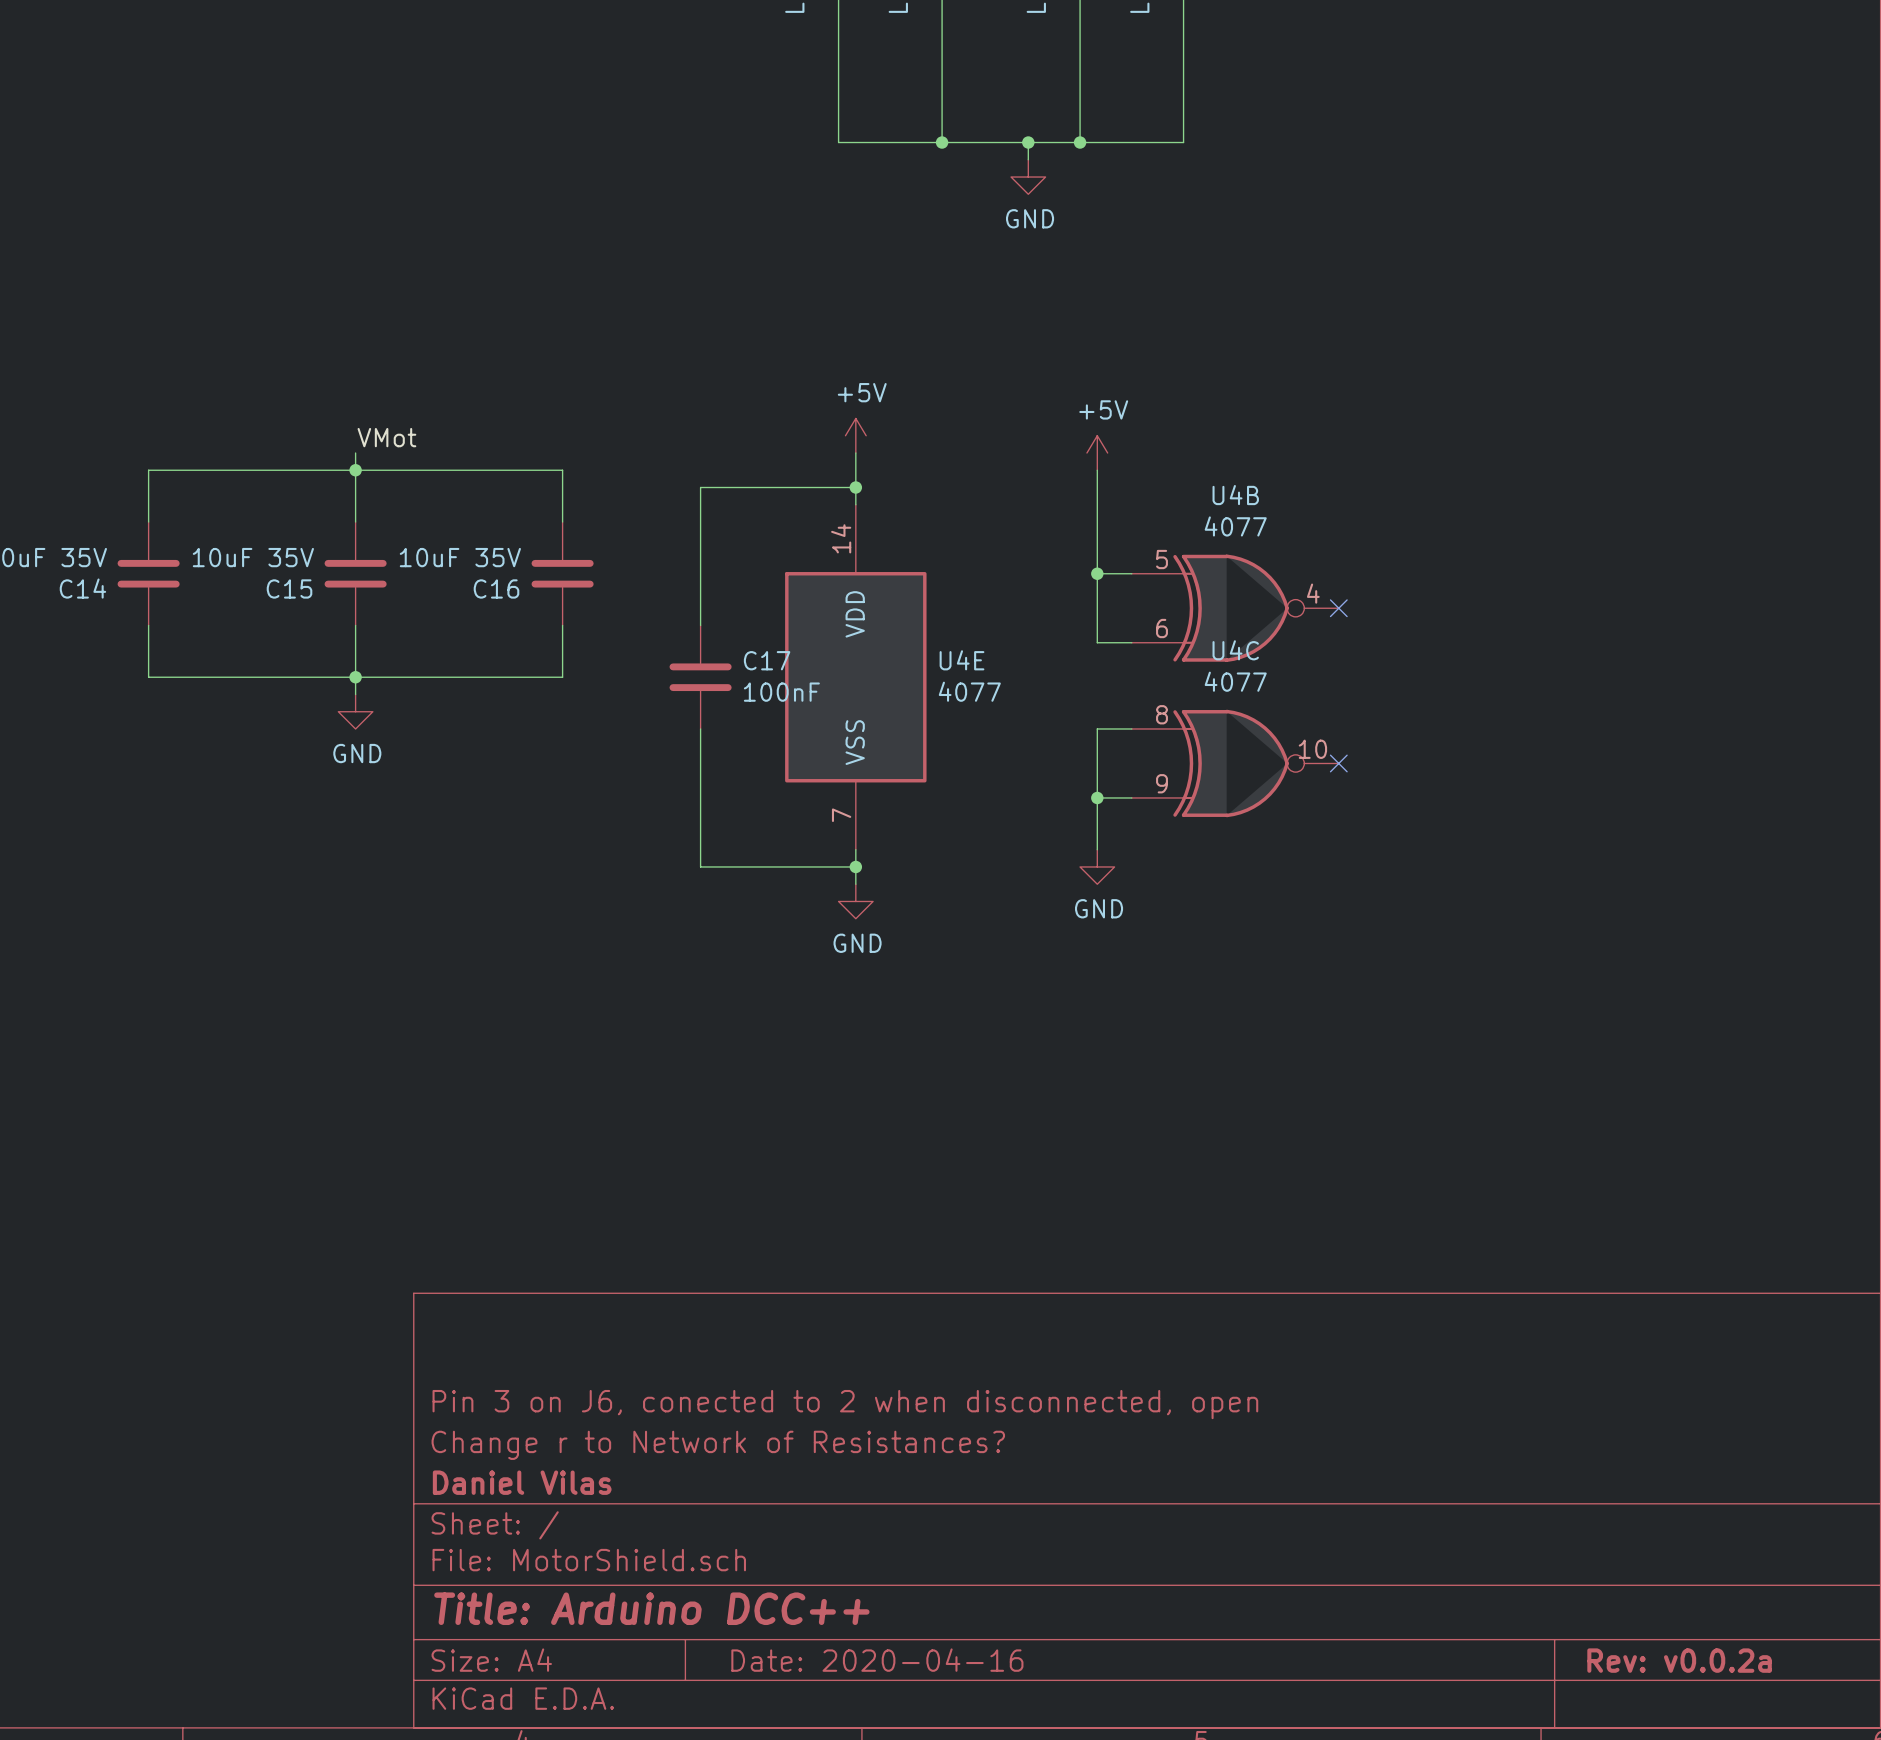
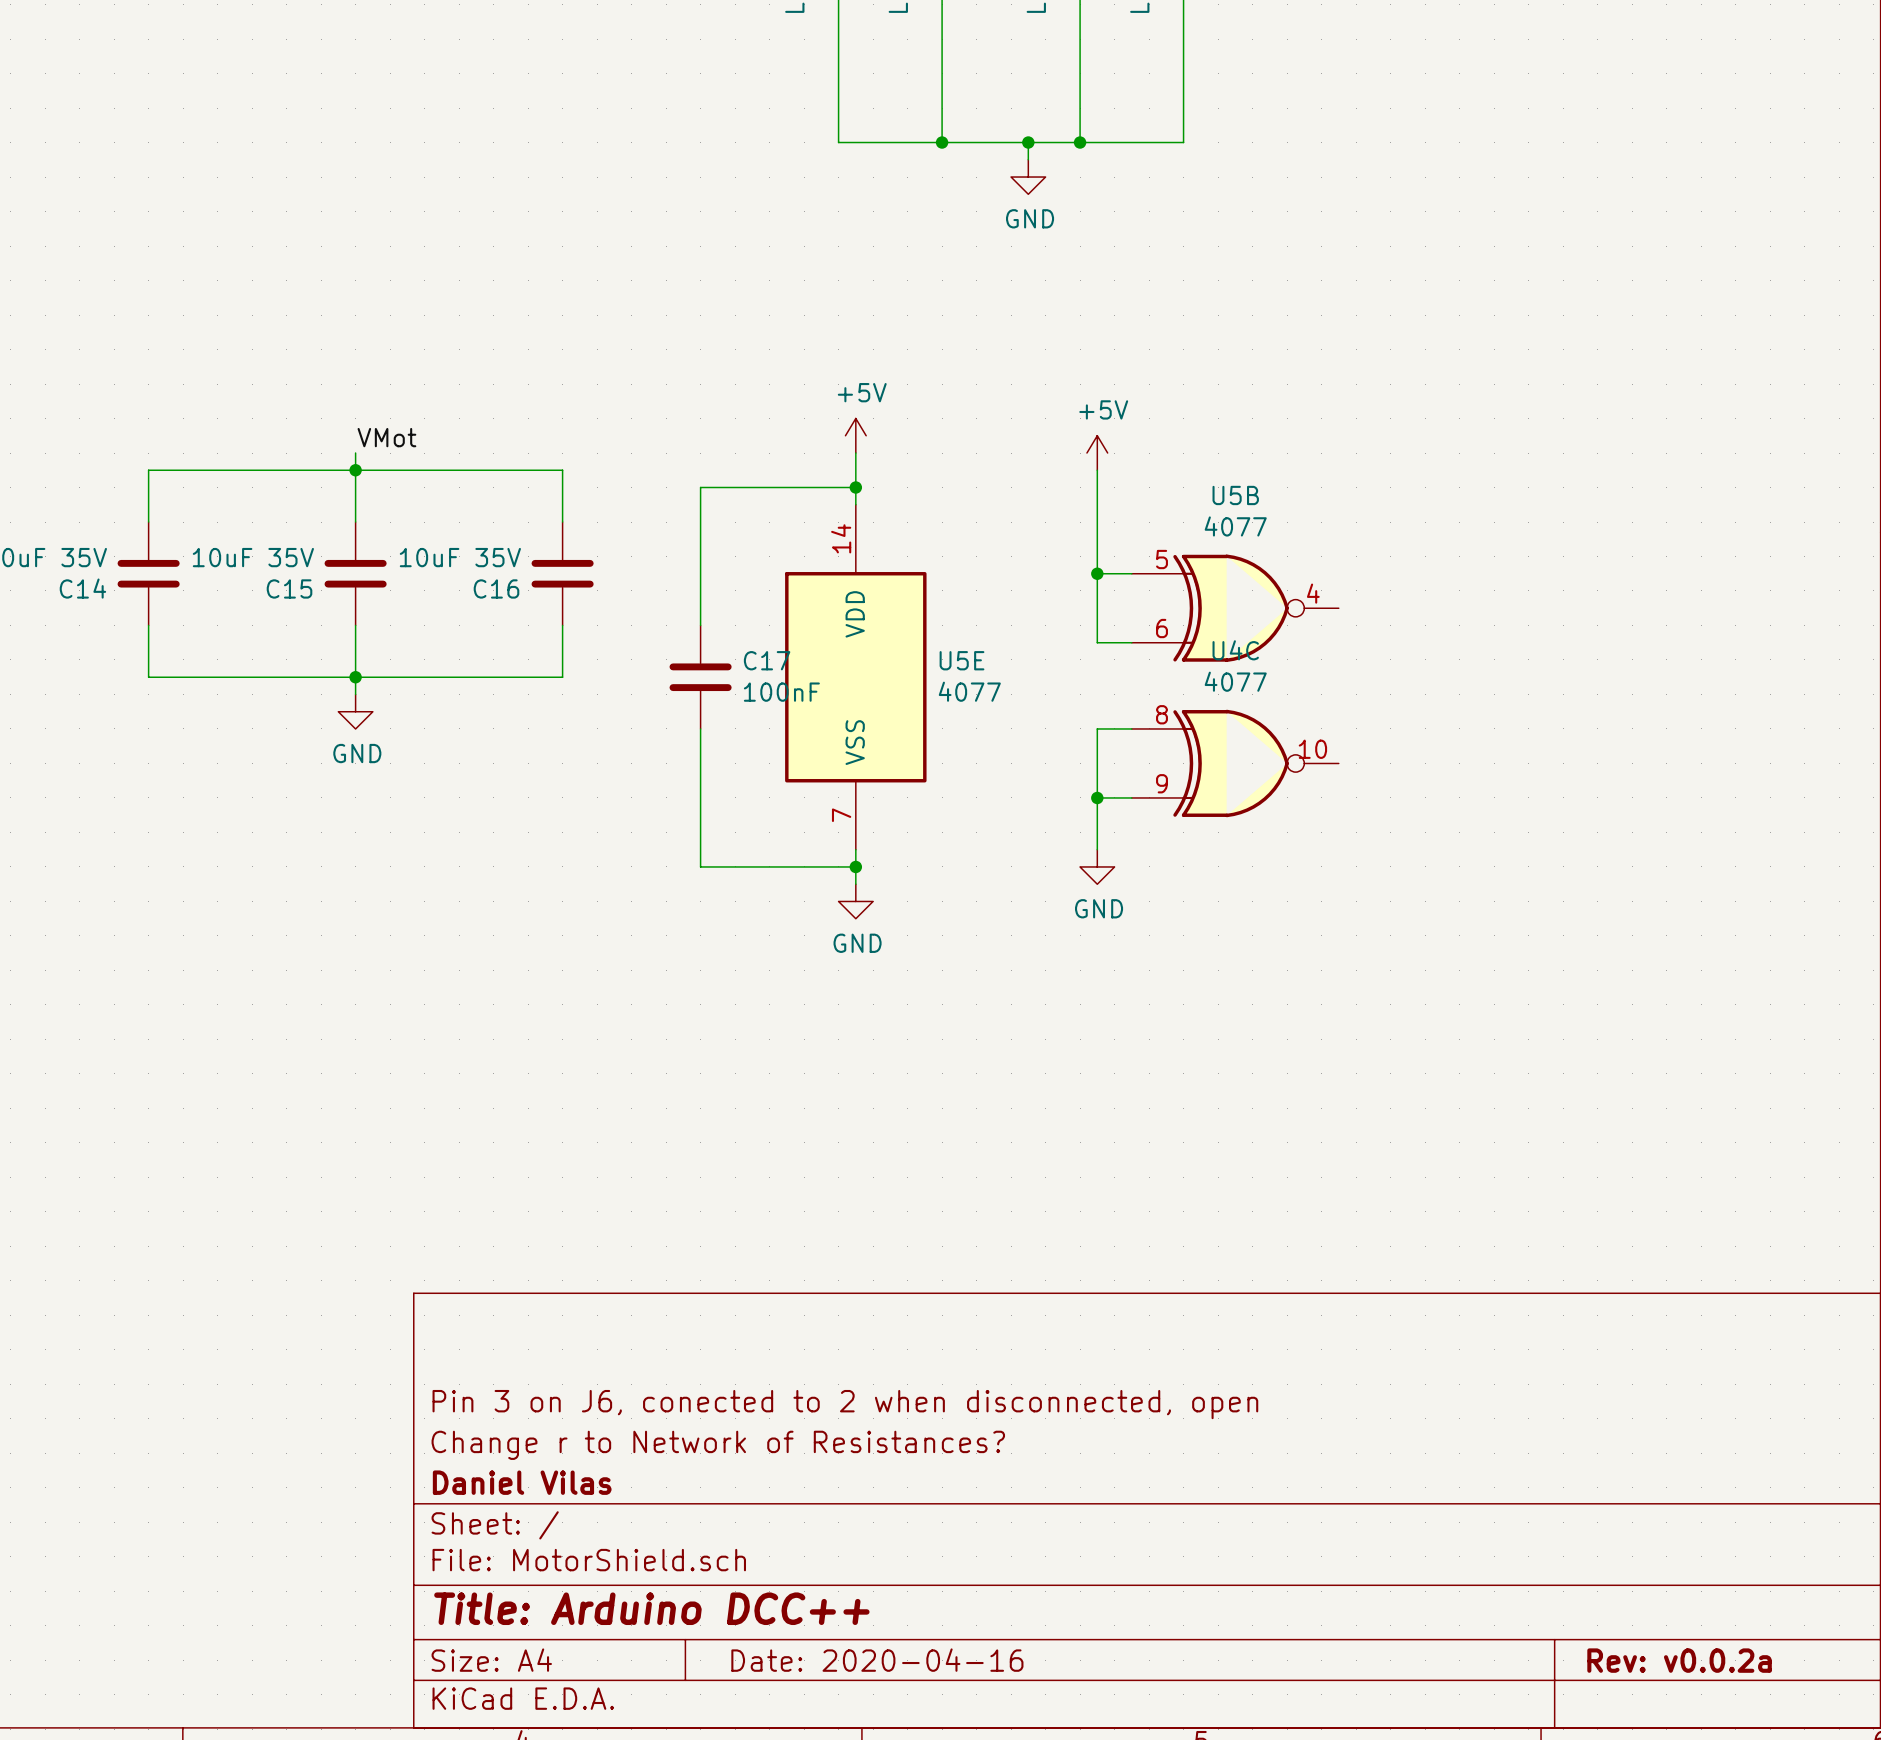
U4B name: U4B (1235, 495) -> U5B (1235, 495)
no-connect mark: (1338, 608) -> none
U4E name: U4E (961, 660) -> U5E (961, 660)
no-connect mark: (1338, 763) -> none

